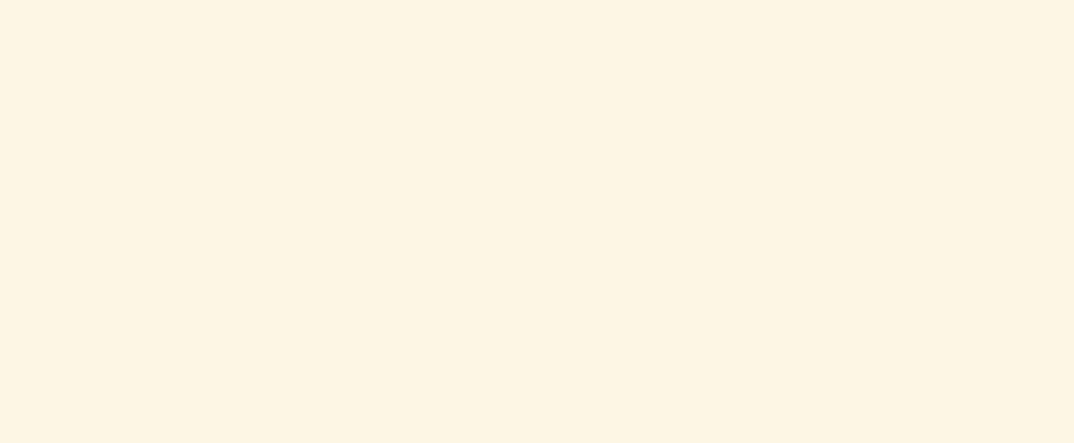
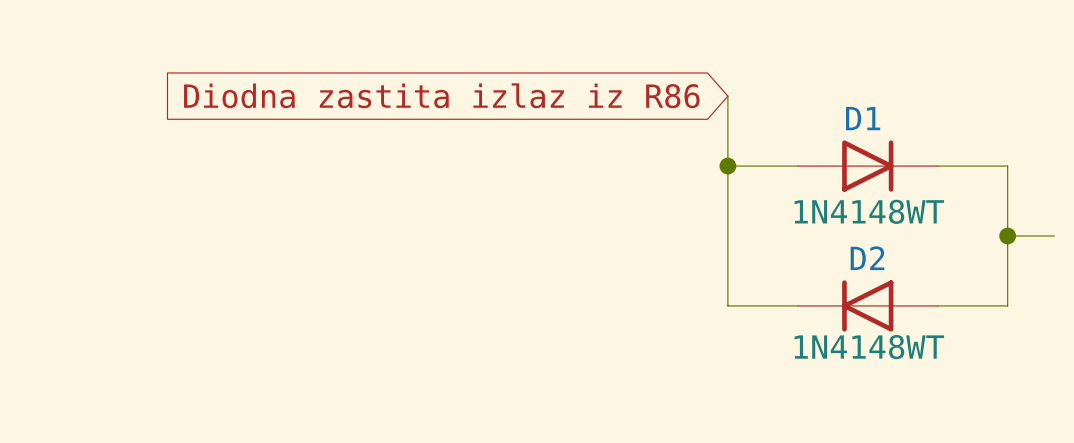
global label: none -> Diodna zastita izlaz iz R86 (441, 95)
wire: none -> (727, 96) (727, 305) (797, 305)
wire: none -> (727, 166) (797, 166)
junction: none -> (727, 166)
D1: none -> 1N4148WT (867, 166)
wire: none -> (937, 166) (1007, 166) (1007, 305) (937, 305)
wire: none -> (1007, 236) (1054, 236)
junction: none -> (1007, 236)
D2: none -> 1N4148WT (867, 305)

